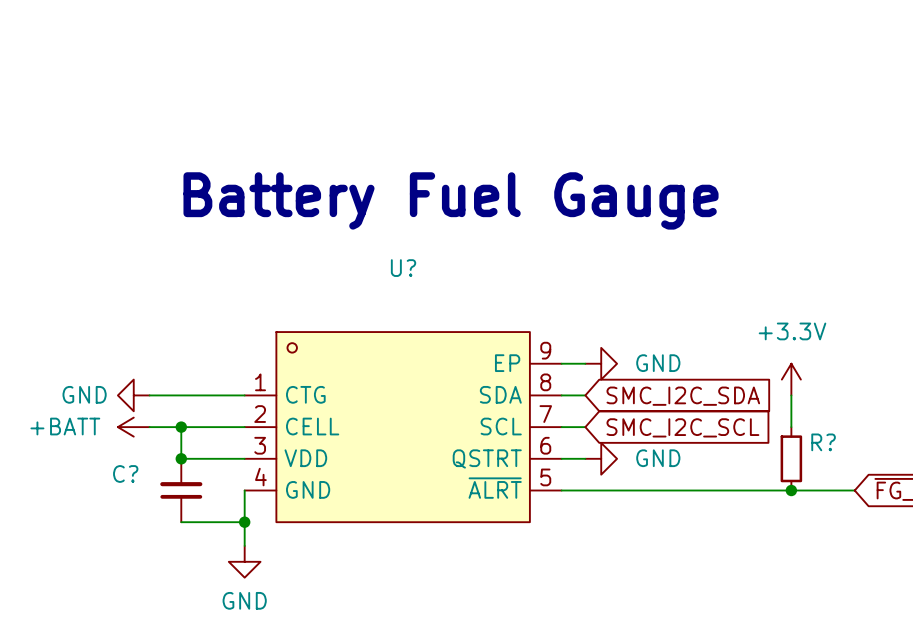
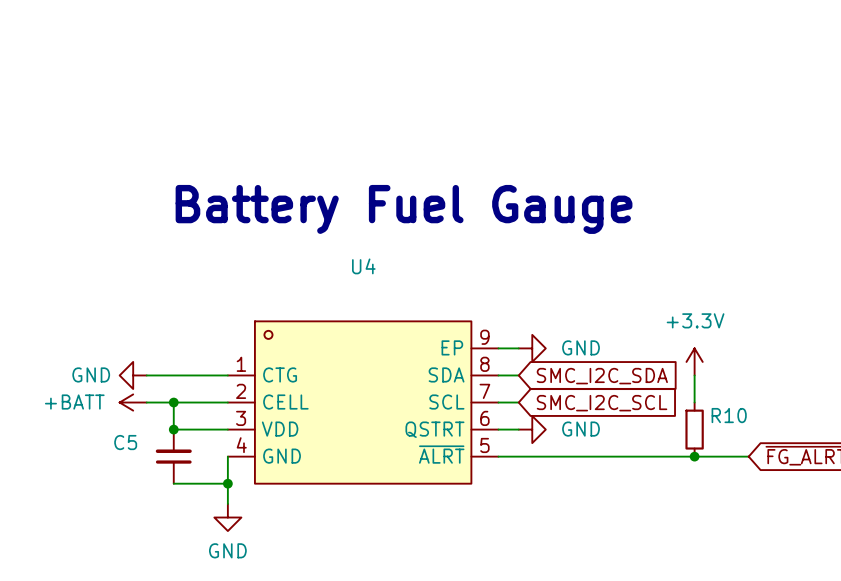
U? name: U? (403, 268) -> U4 (363, 266)
R? name: R? (823, 442) -> R10 (729, 415)
C? name: C? (125, 473) -> C5 (125, 442)

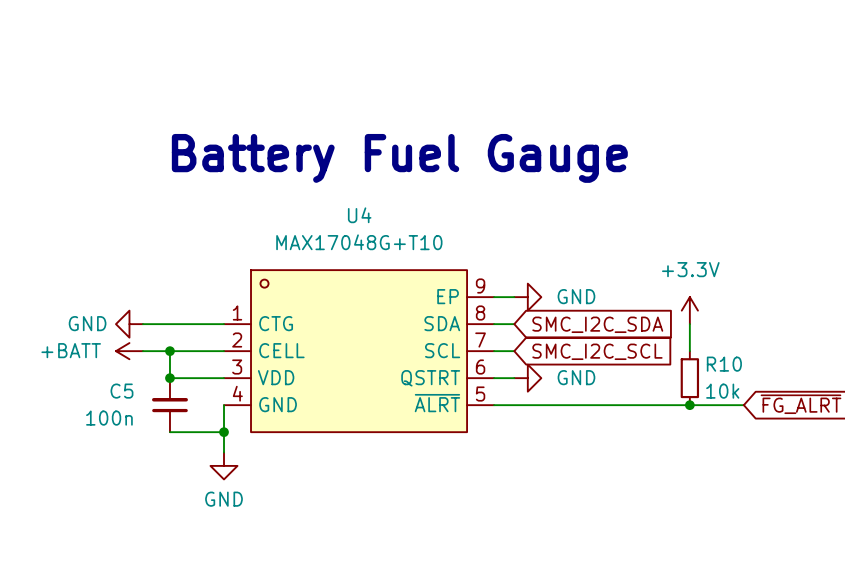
U4 value: none -> MAX17048G+T10 (359, 242)
R10 value: none -> 10k (722, 391)
C5 value: none -> 100n (109, 418)

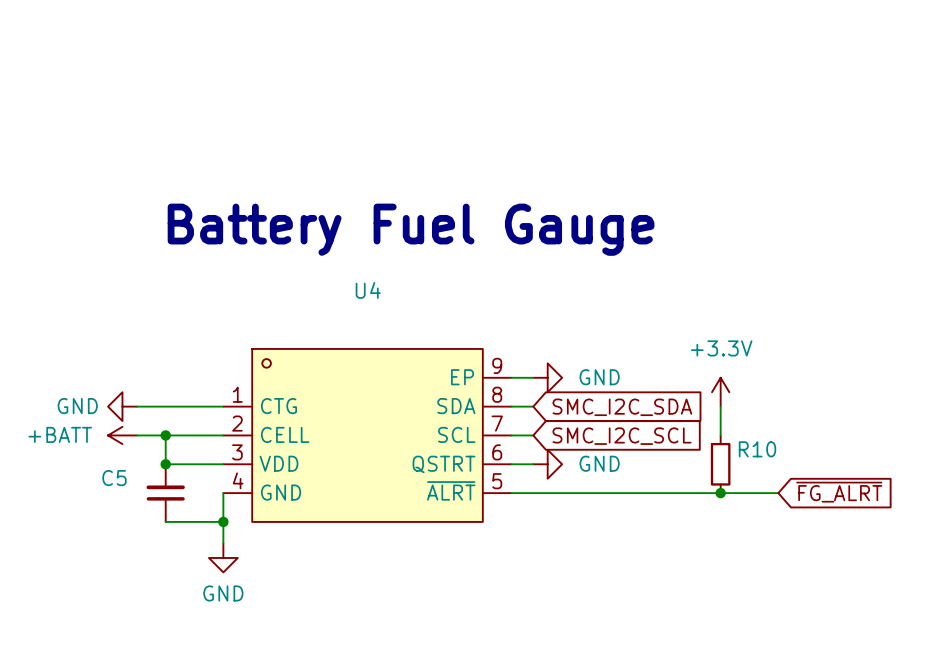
U4 value: MAX17048G+T10 (359, 242) -> none
R10 value: 10k (722, 391) -> none
C5 value: 100n (109, 418) -> none

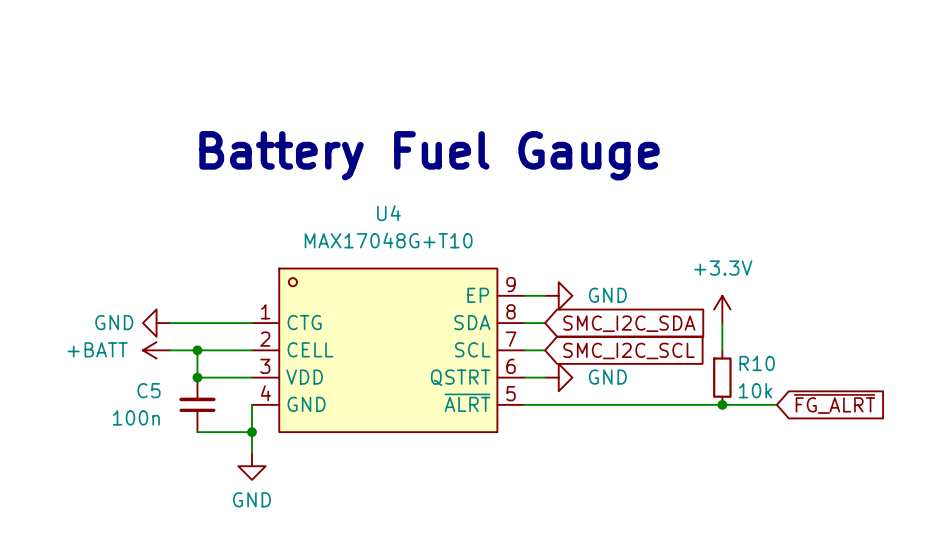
U4 value: none -> MAX17048G+T10 (388, 240)
R10 value: none -> 10k (755, 390)
C5 value: none -> 100n (136, 417)

